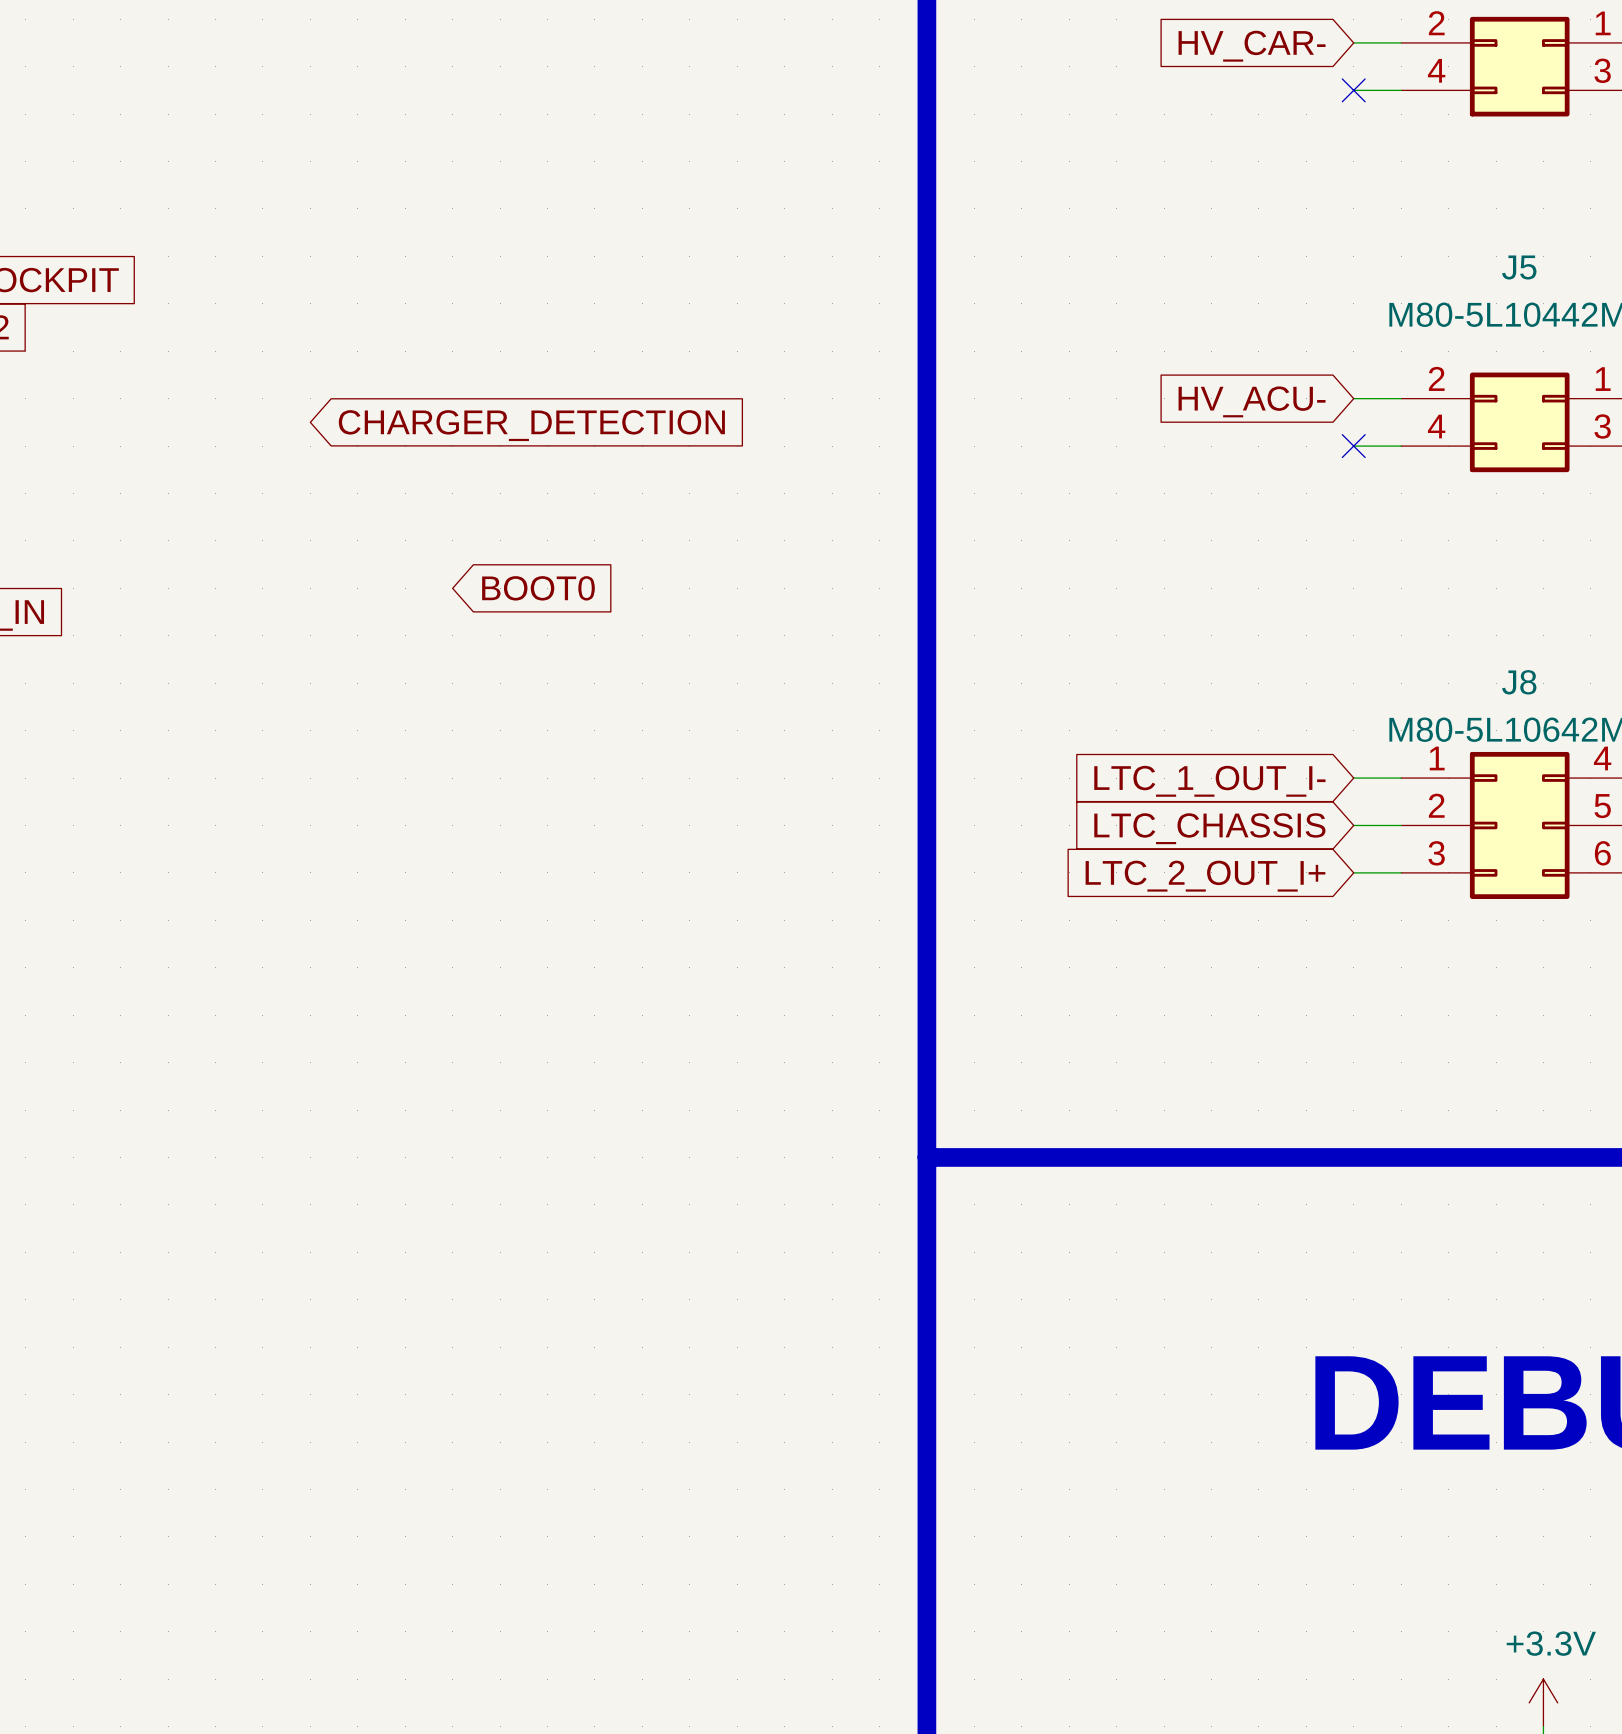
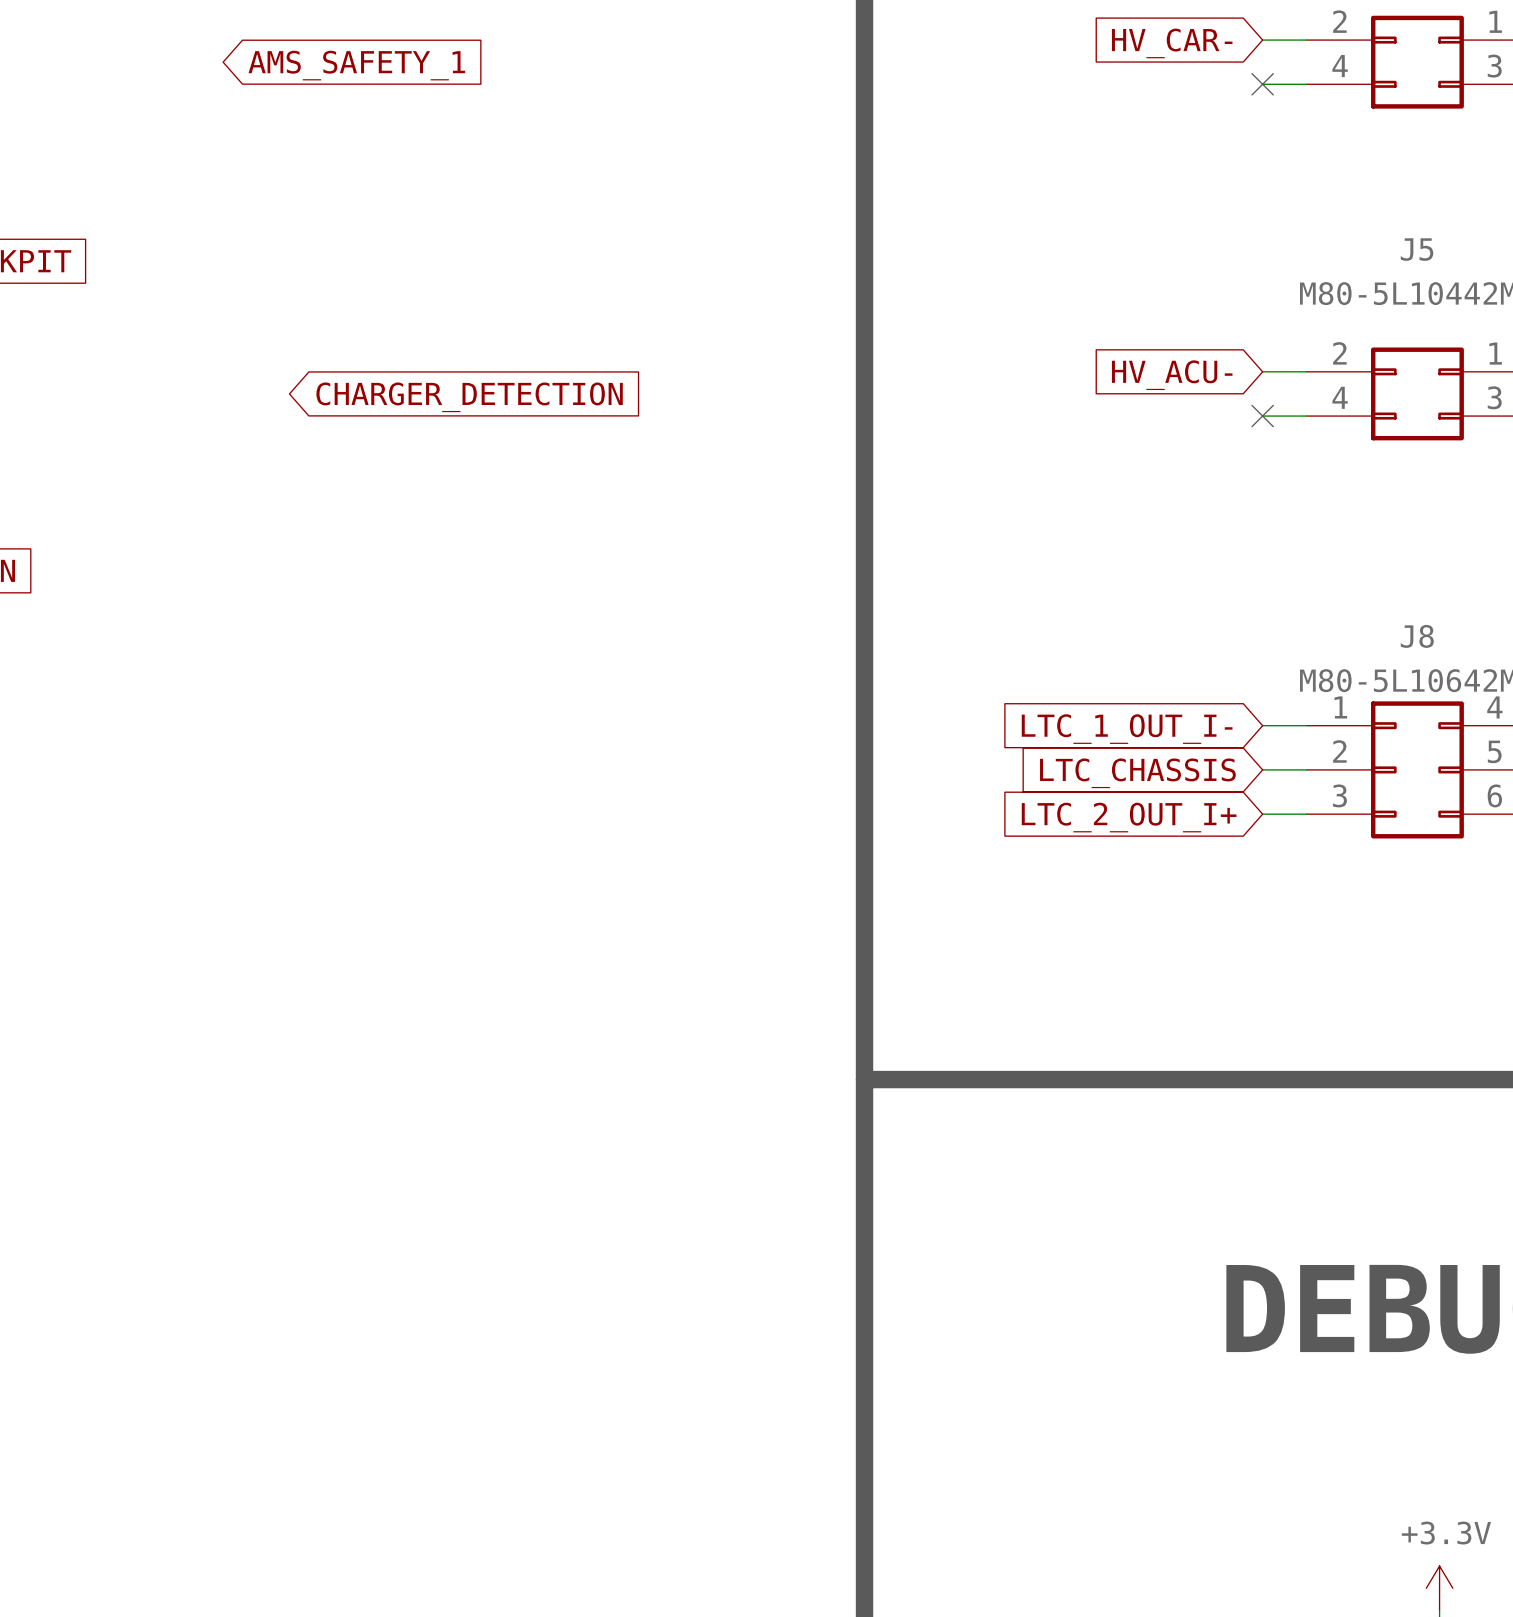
global label: none -> AMS_SAFETY_1 (356, 65)
global label: BOOT0 (538, 588) -> none

